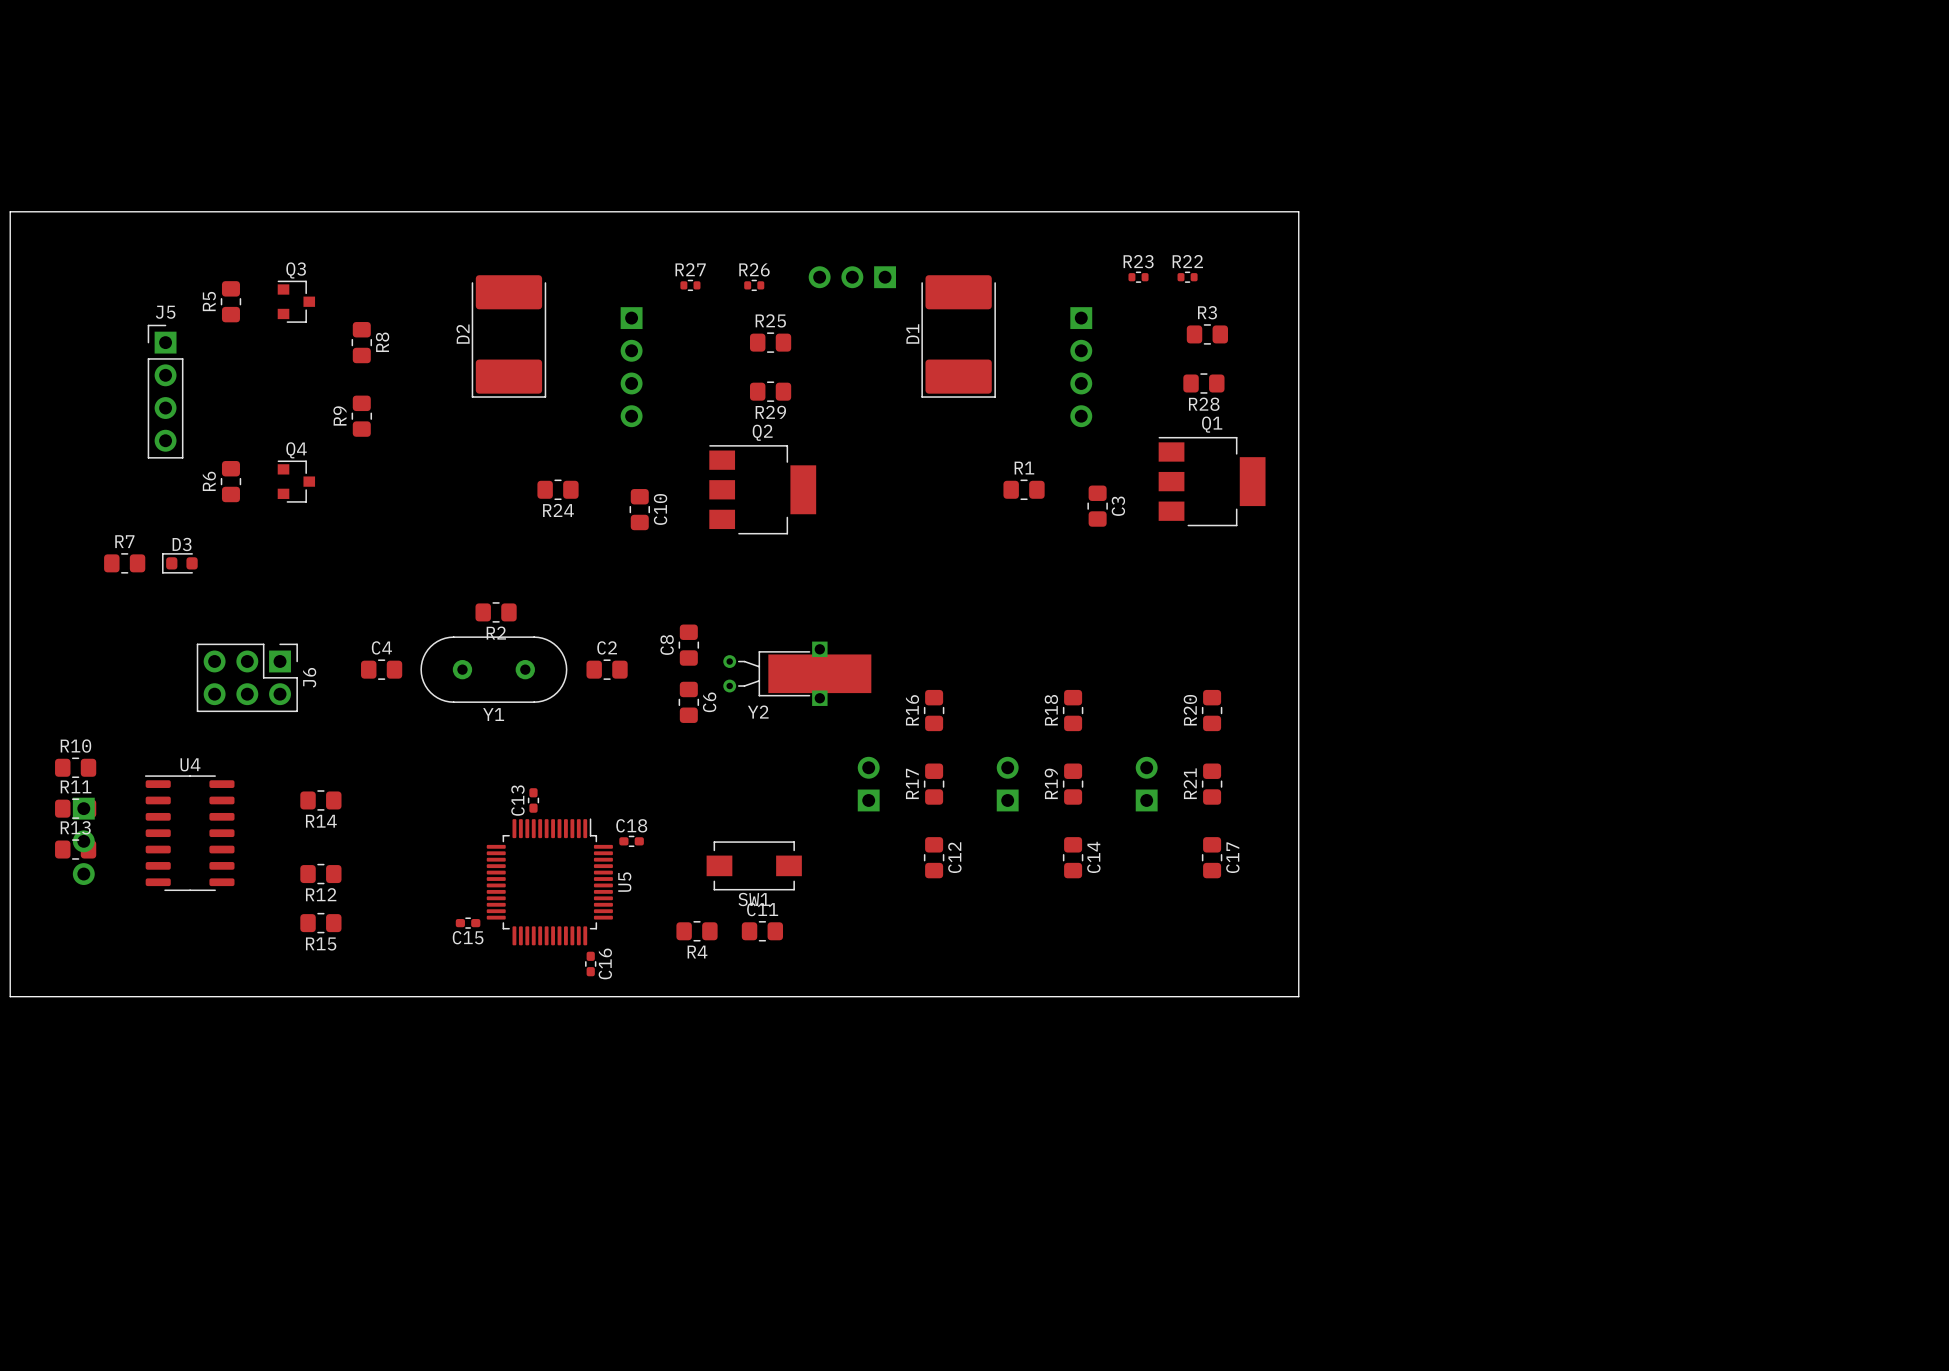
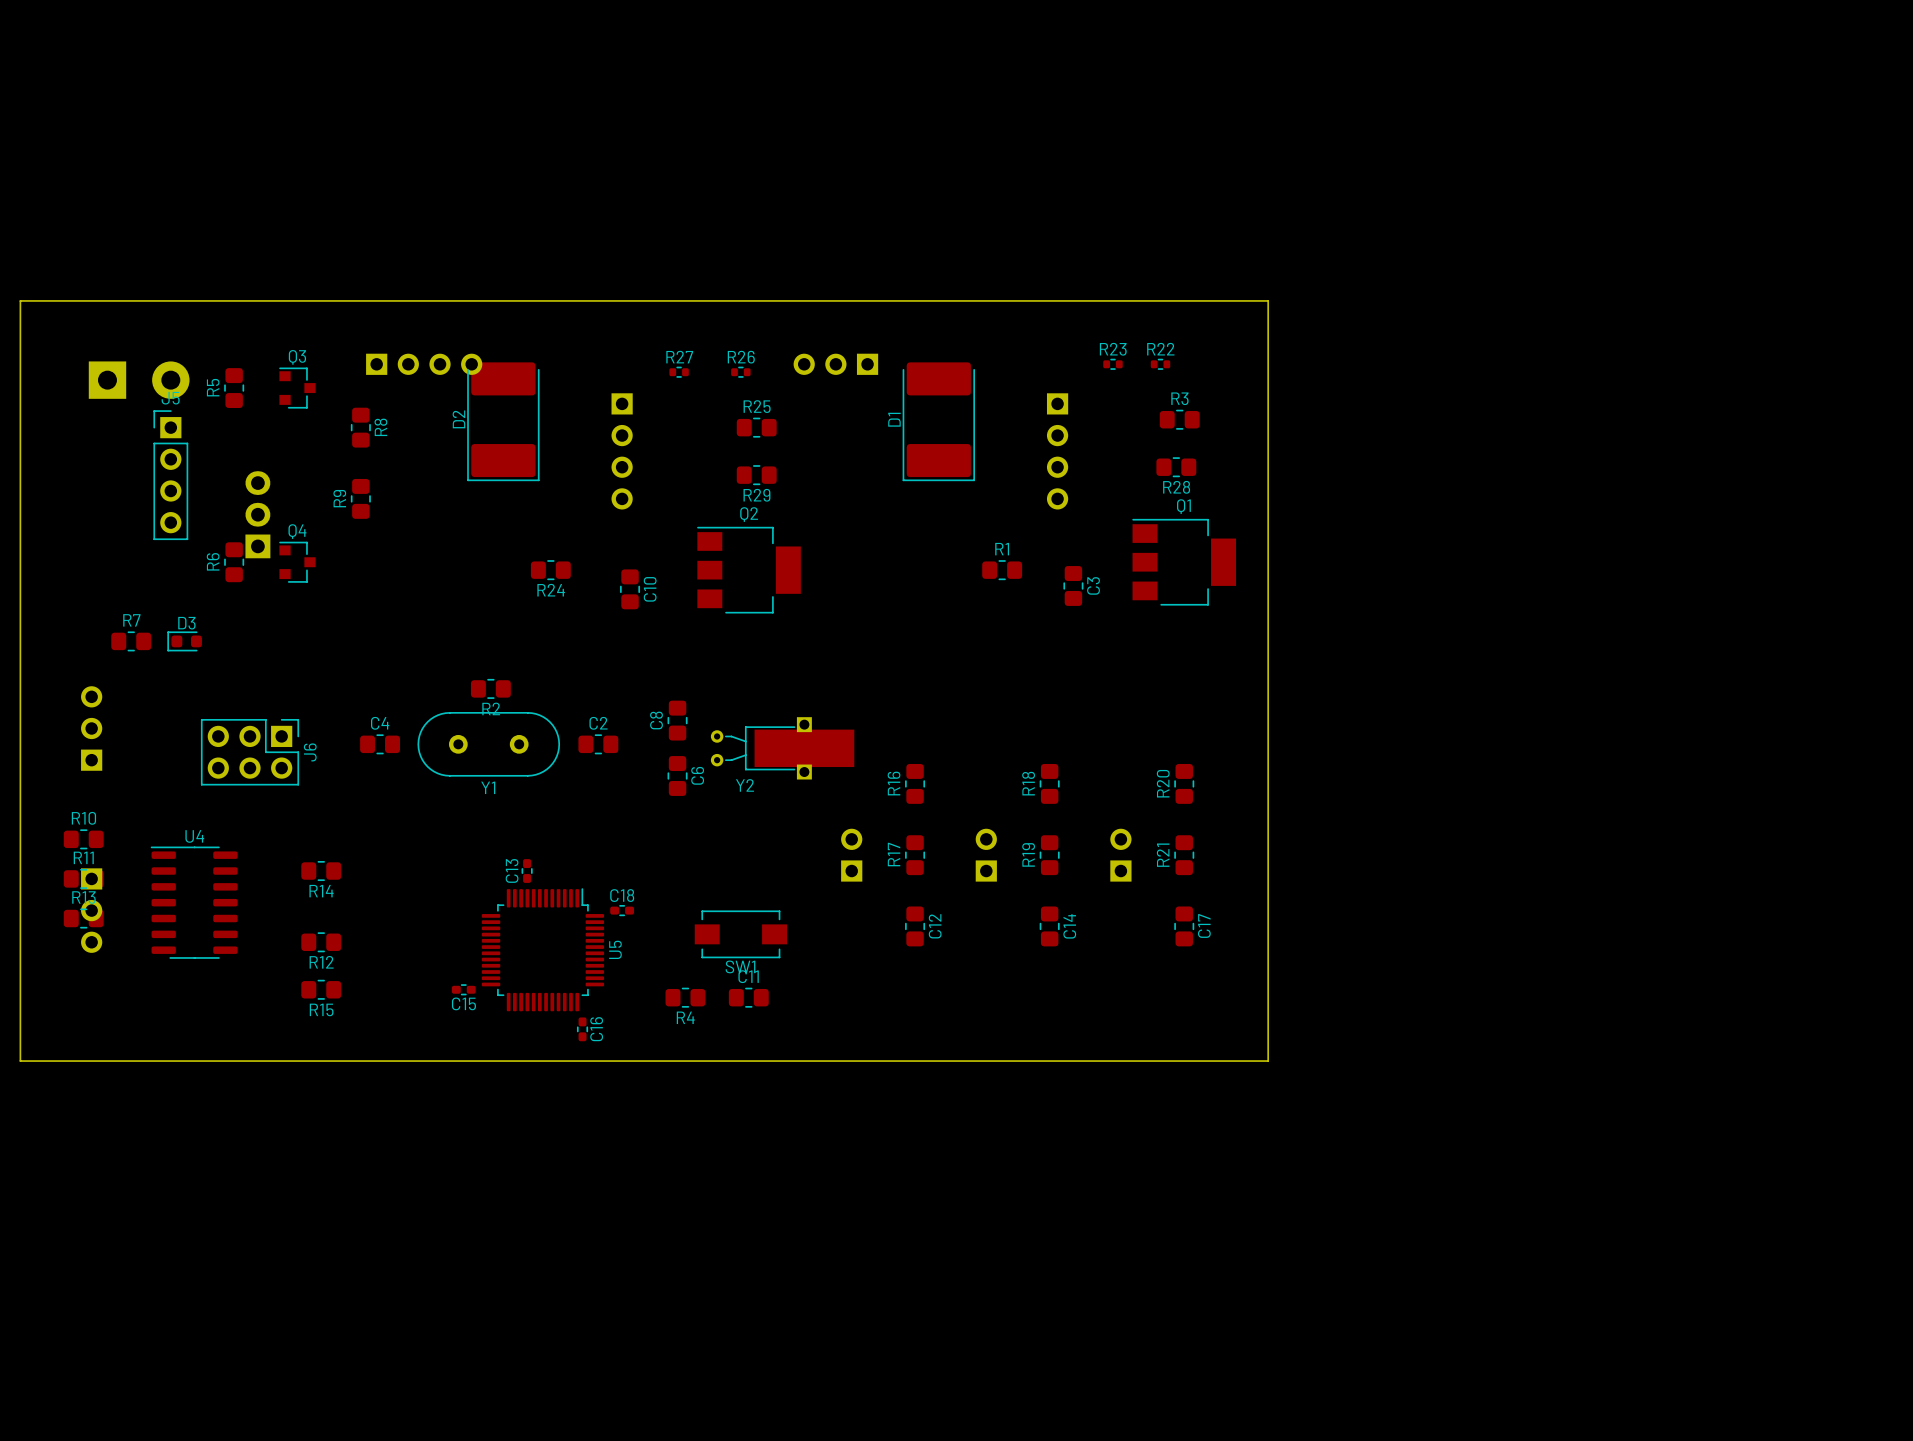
part: none -> (424, 364)
part: none -> (139, 380)
part: none -> (257, 514)
part: none -> (91, 728)

